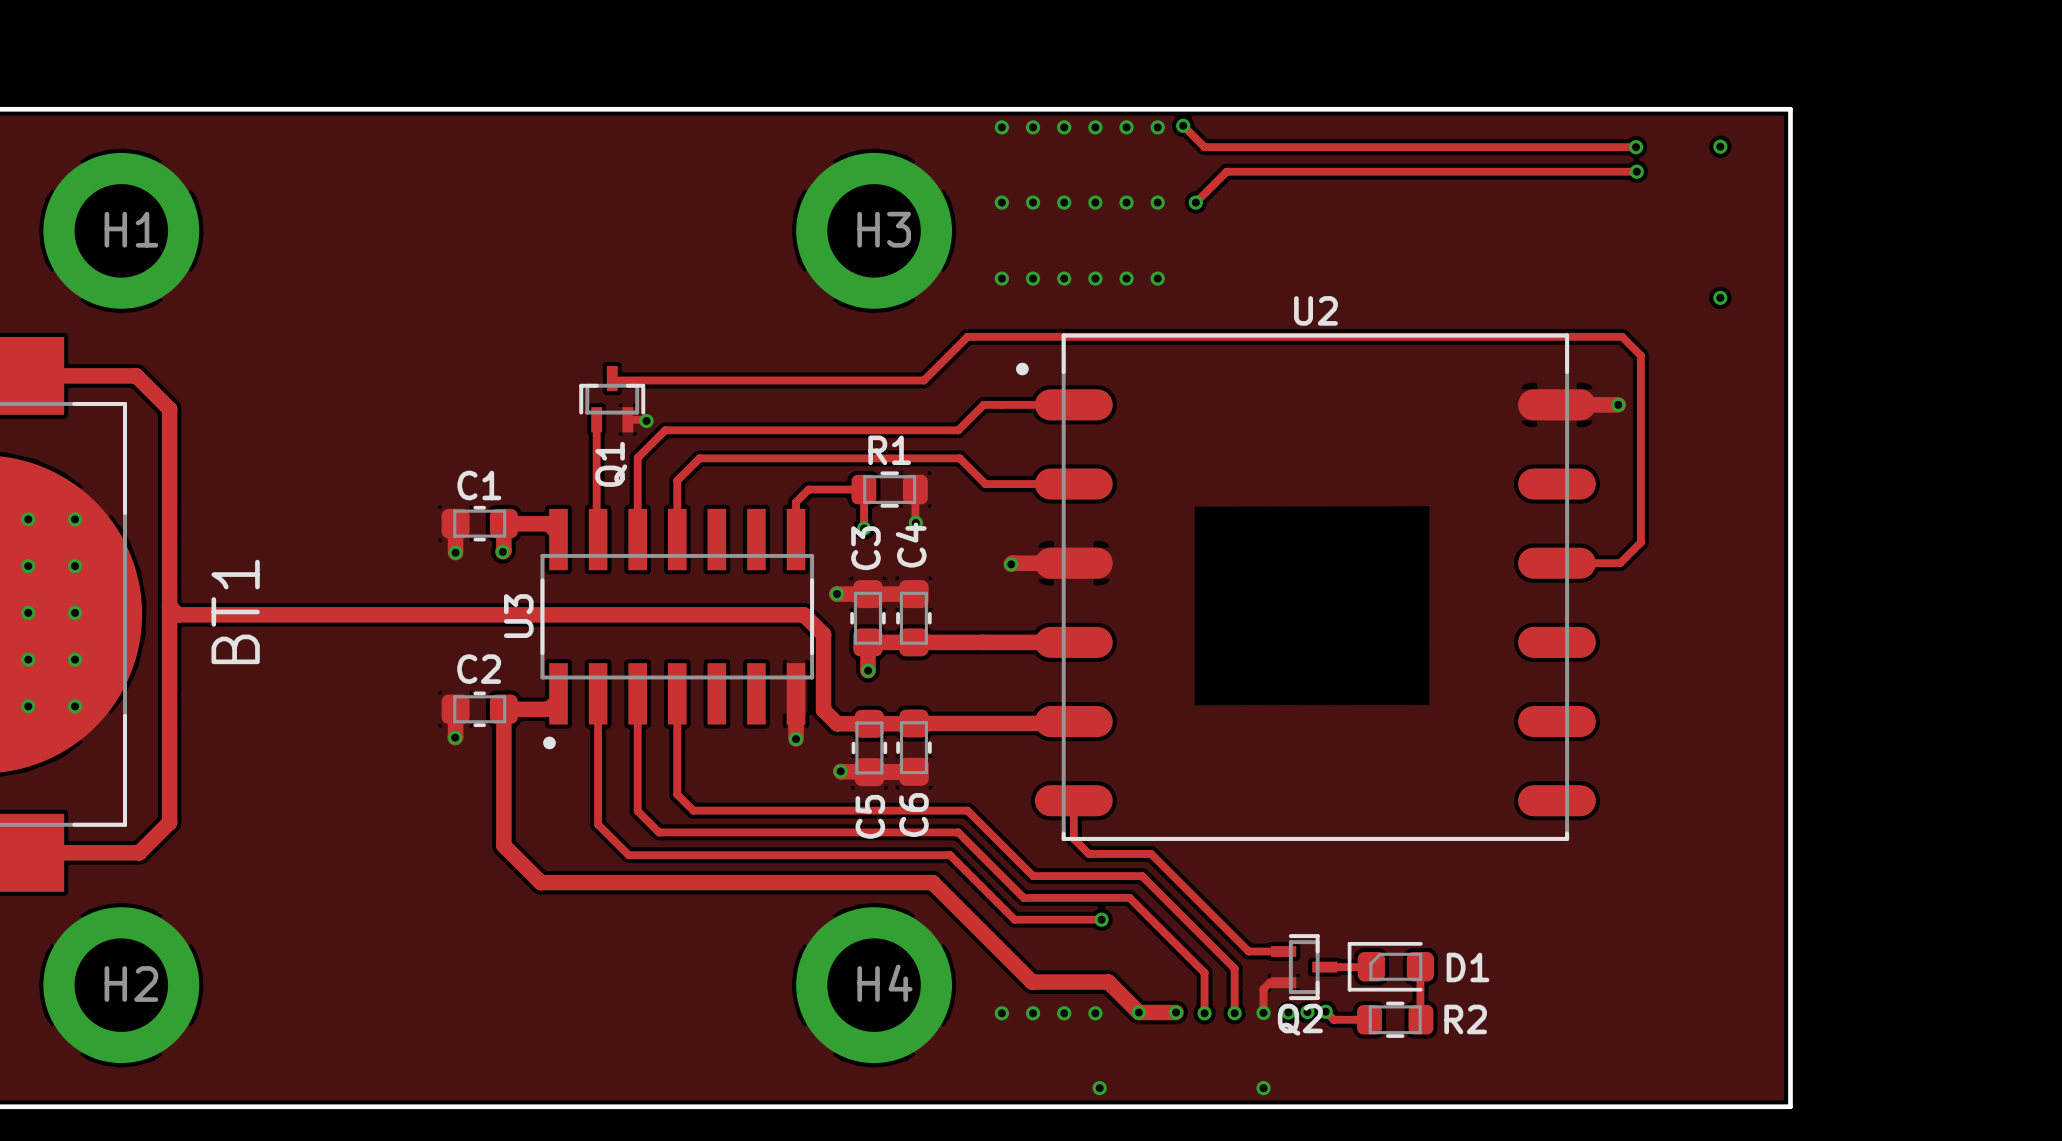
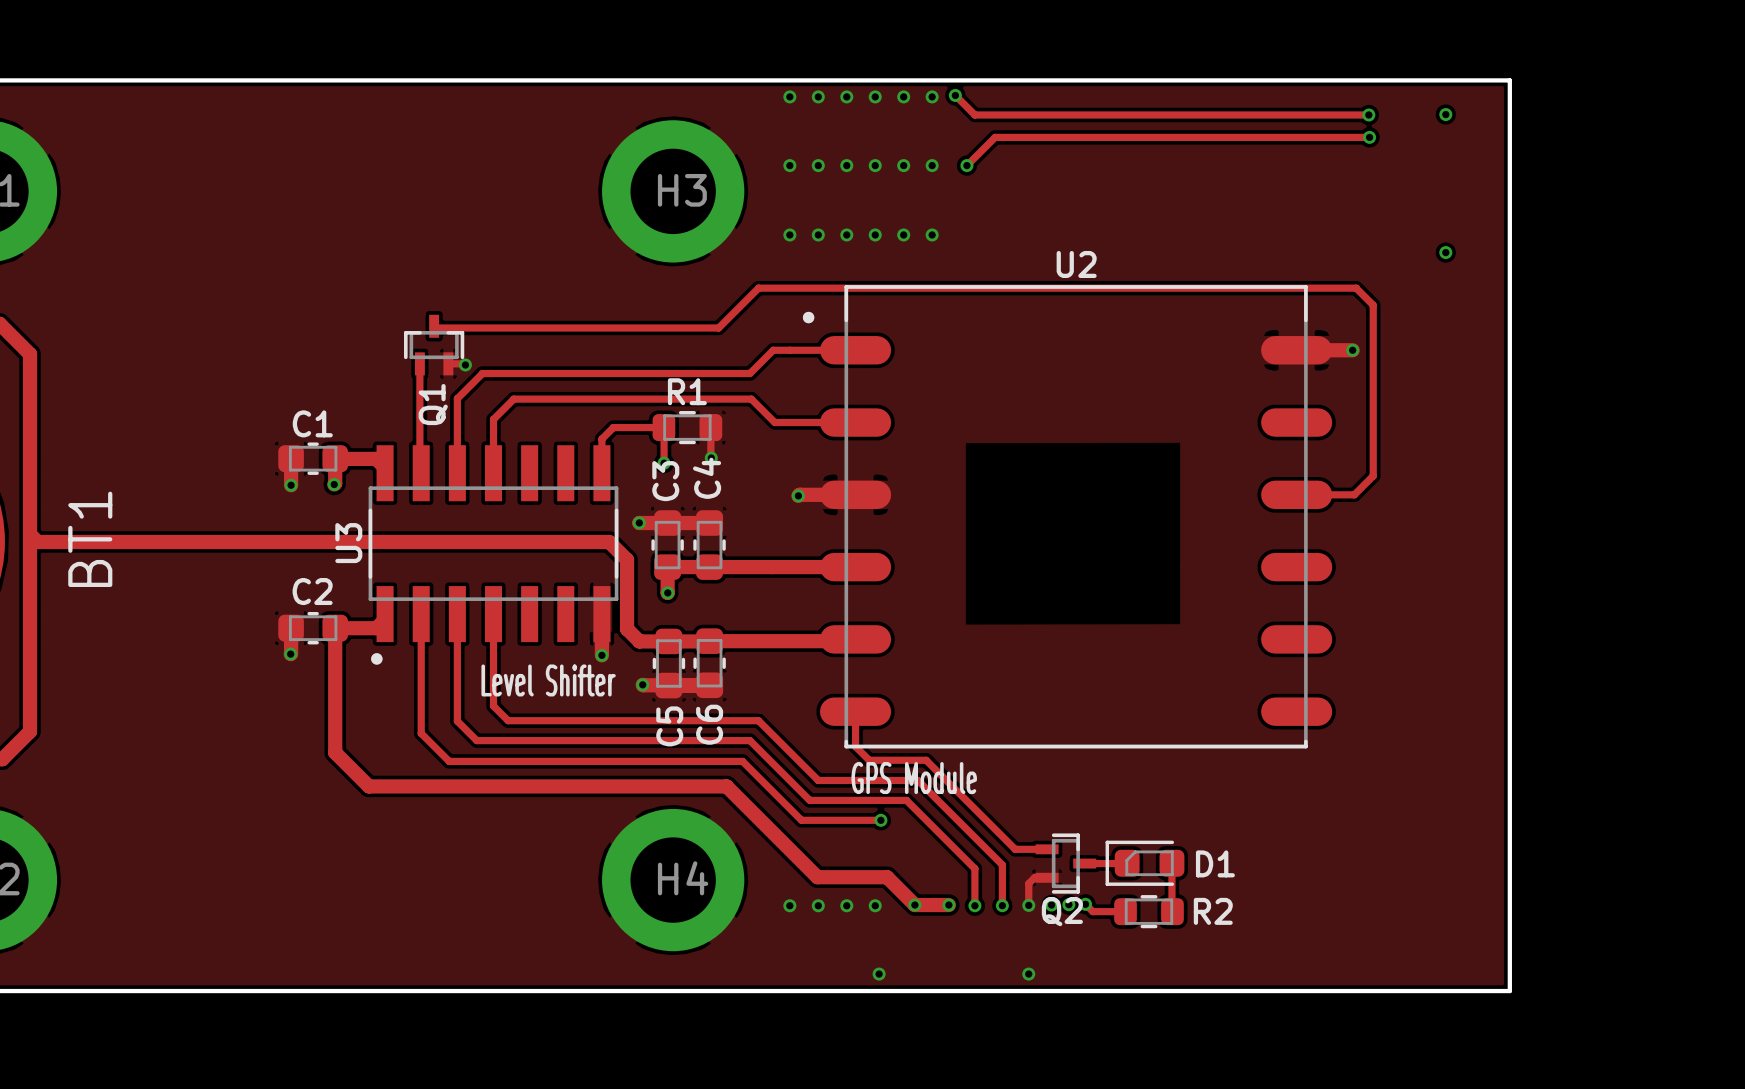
text: none -> Level Shifter (548, 680)
text: none -> GPS Module (914, 778)

